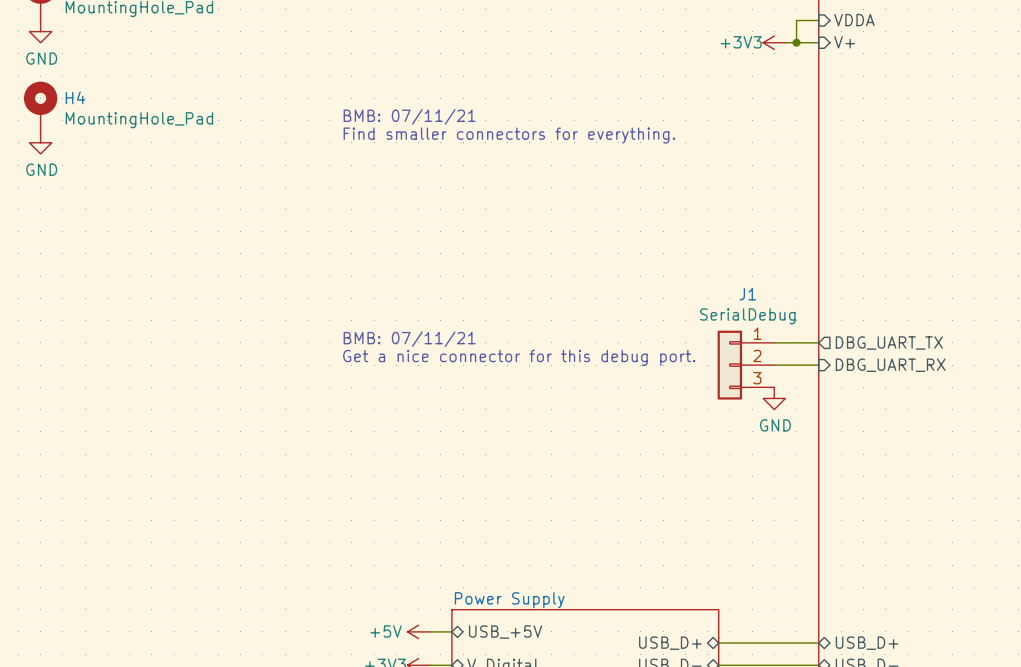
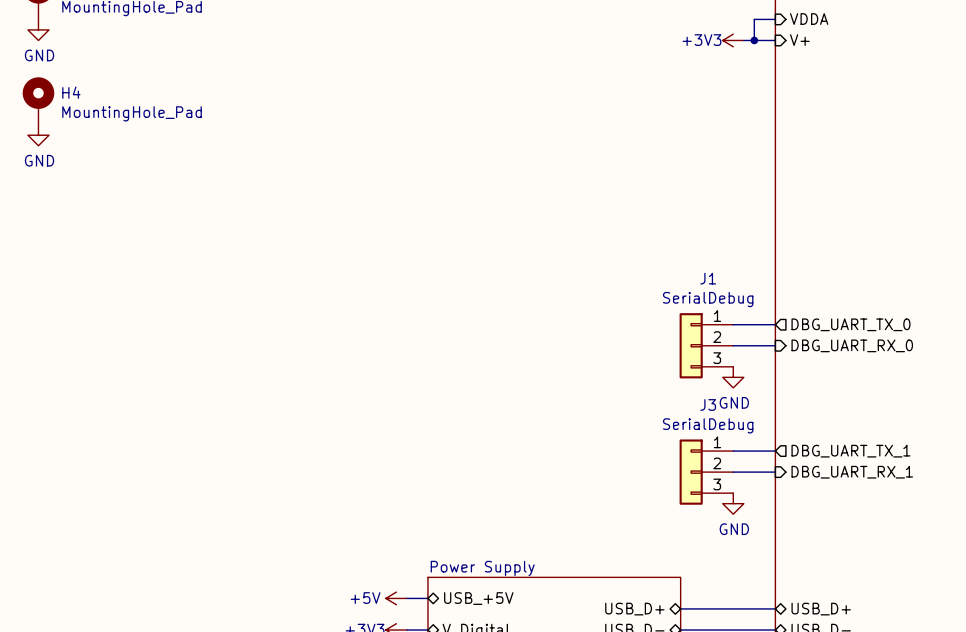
text: BMB: 07/11/21 (409, 116) -> none
text: Find smaller connectors for everything. (509, 135) -> none
text: BMB: 07/11/21 (409, 339) -> none
sheet pin: DBG_UART_TX (889, 343) -> DBG_UART_TX_0 (850, 324)
text: Get a nice connector for this debug port. (519, 357) -> none
sheet pin: DBG_UART_RX (890, 365) -> DBG_UART_RX_0 (852, 345)
wire: none -> (733, 451) (775, 451)
sheet pin: none -> DBG_UART_TX_1 (850, 451)
J3: none -> SerialDebug (706, 472)
wire: none -> (733, 472) (775, 472)
sheet pin: none -> DBG_UART_RX_1 (852, 472)
power symbol: none -> GND (733, 503)

